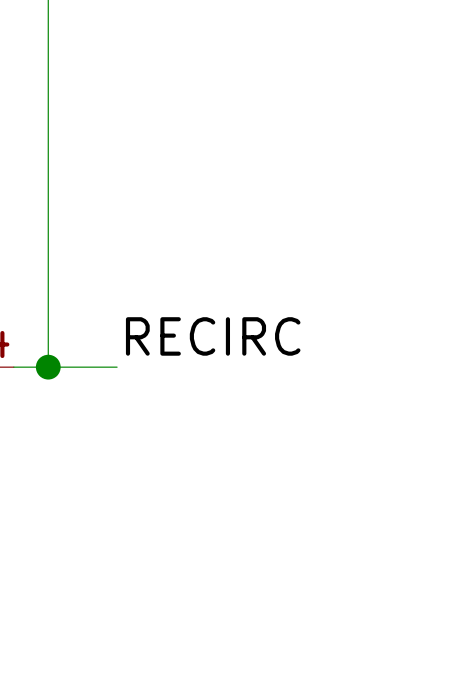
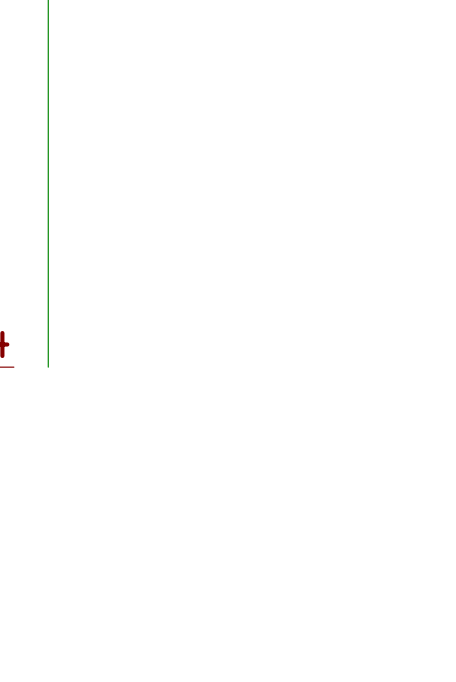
label: RECIRC (213, 336) -> none
wire: (13, 367) (117, 367) -> none
junction: (48, 367) -> none

